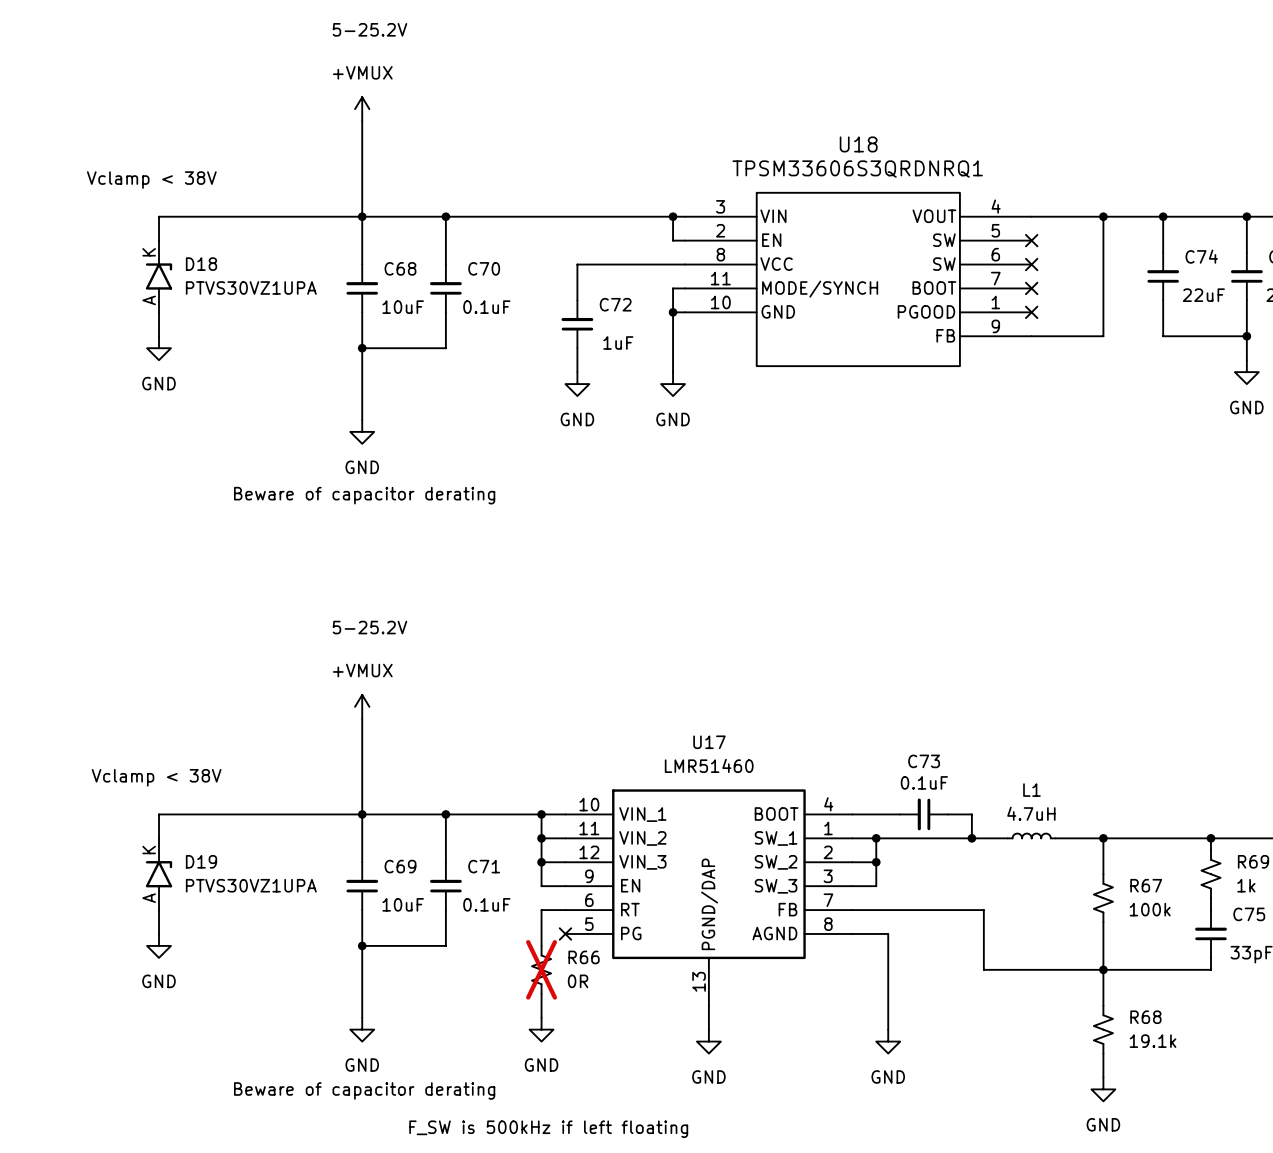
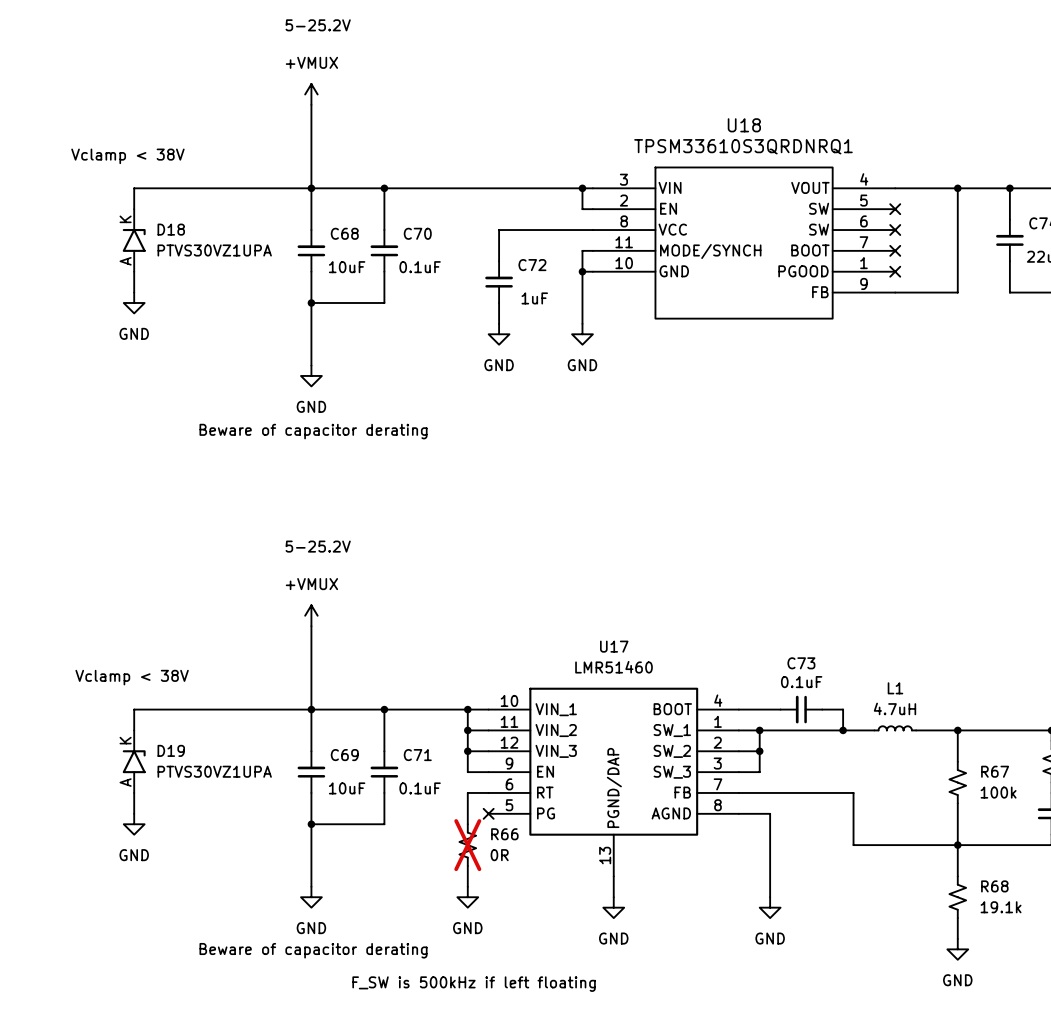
U18 value: TPSM33606S3QRDNRQ1 (857, 169) -> TPSM33610S3QRDNRQ1 (743, 146)

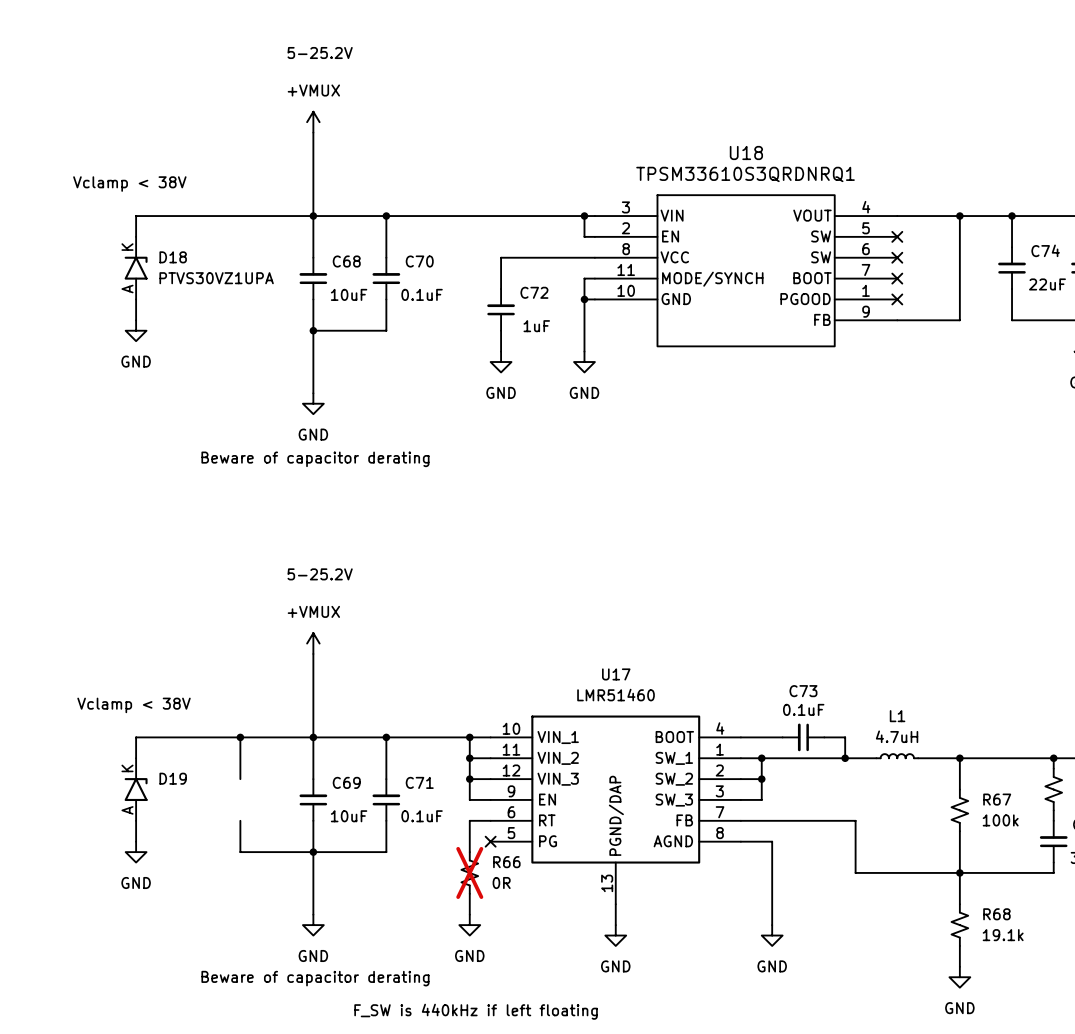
wire: none -> (240, 737) (240, 779)
junction: none -> (240, 737)
D19 value: PTVS30VZ1UPA (214, 771) -> none
wire: none -> (240, 820) (240, 852) (313, 852)
text: F_SW is 500kHz if left floating (474, 984) -> F_SW is 440kHz if left floating (476, 1011)

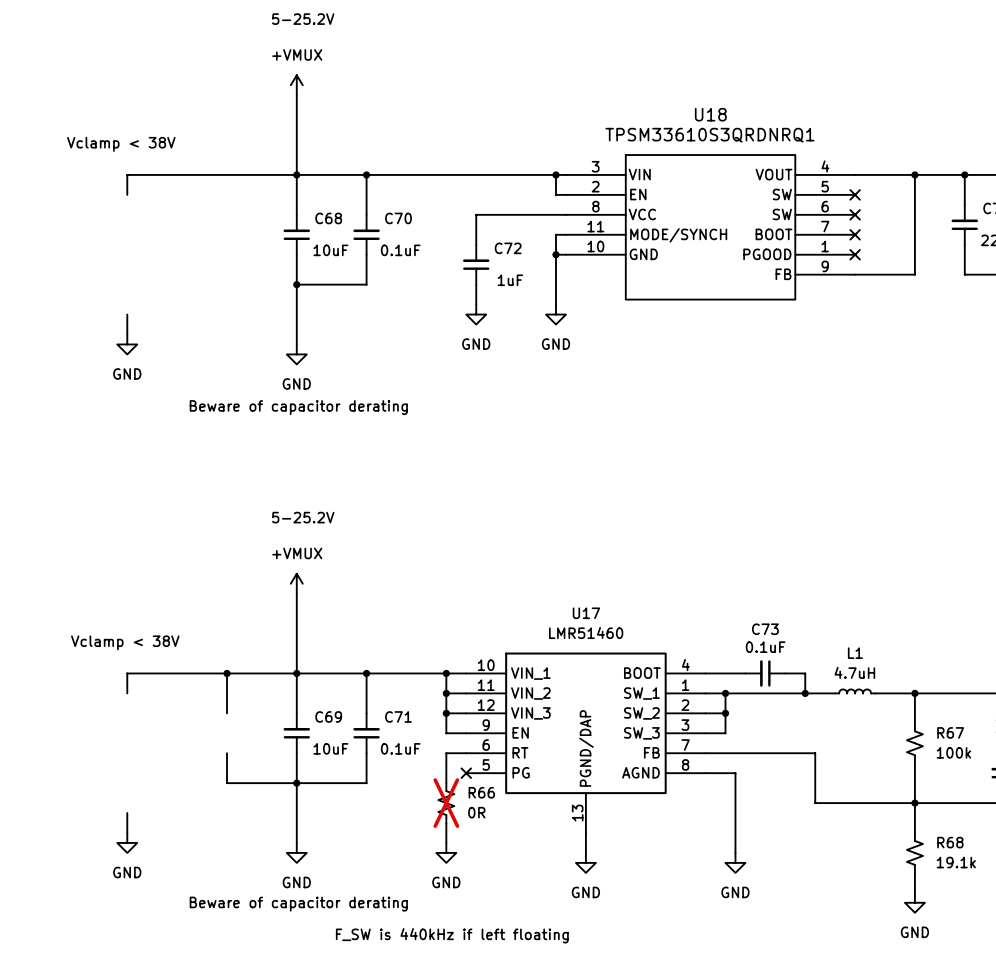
D18: PTVS30VZ1UPA (136, 268) -> none
wire: (136, 299) (136, 320) -> (127, 314) (127, 334)
power symbol position: GND (136, 330) -> GND (127, 344)
D19: (136, 789) -> none
wire: (136, 820) (136, 841) -> (127, 813) (127, 832)
power symbol position: GND (136, 852) -> GND (127, 842)

